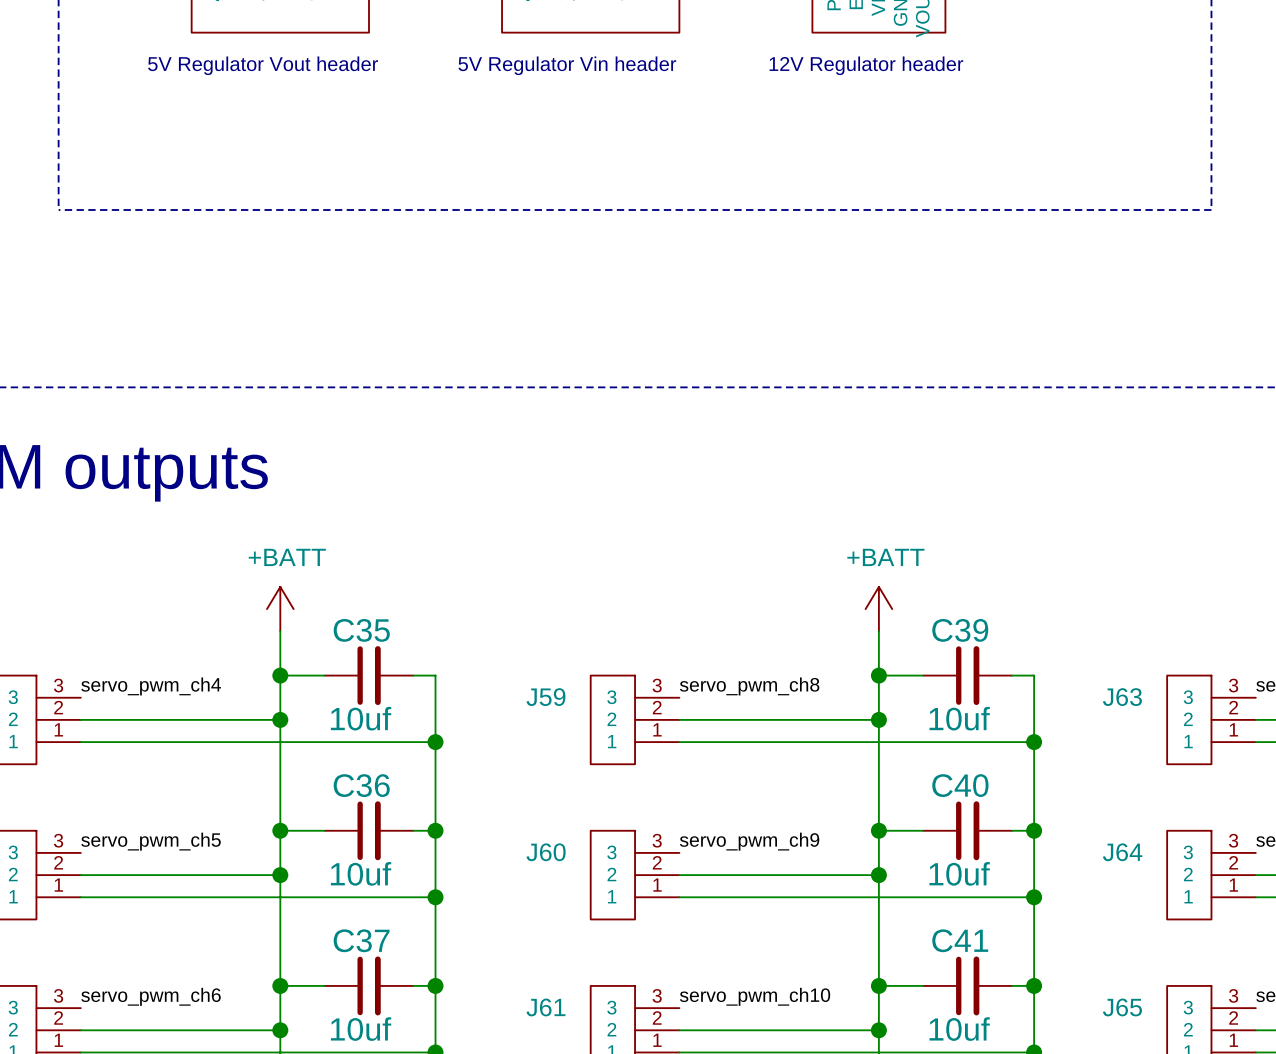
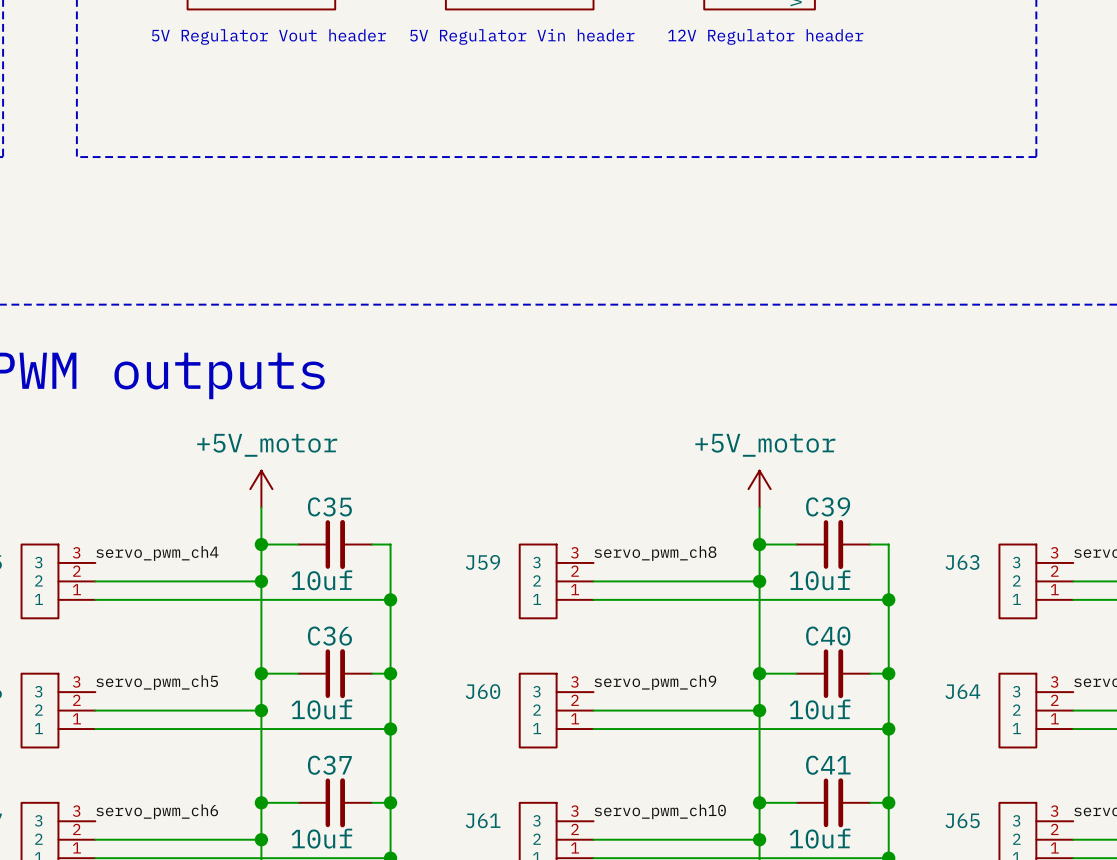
power symbol: +BATT (280, 609) -> +5V_motor (261, 489)
power symbol: +BATT (878, 609) -> +5V_motor (759, 489)

